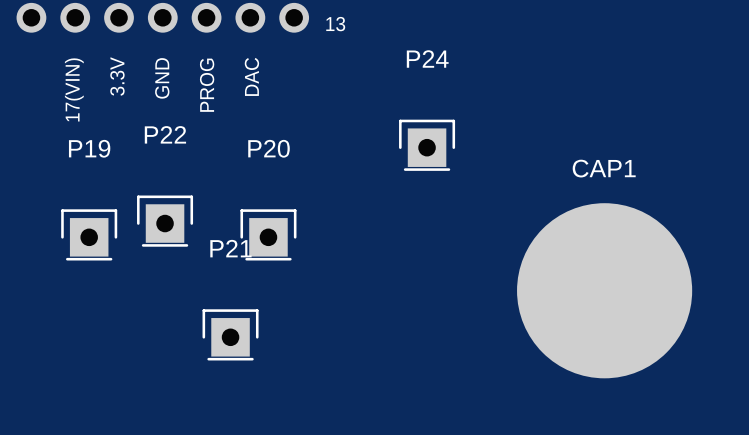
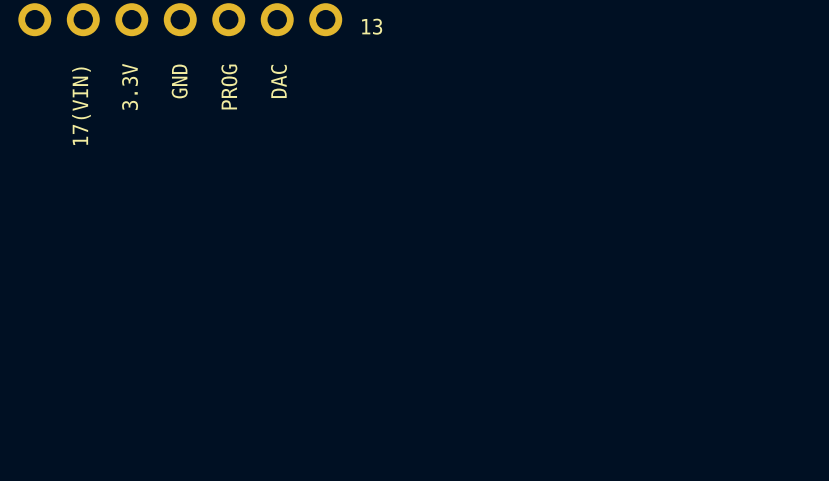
P24: (427, 145) -> none
P22: (165, 221) -> none
P19: (89, 234) -> none
P20: (268, 234) -> none
CAP1: (604, 290) -> none
P21: (230, 334) -> none

